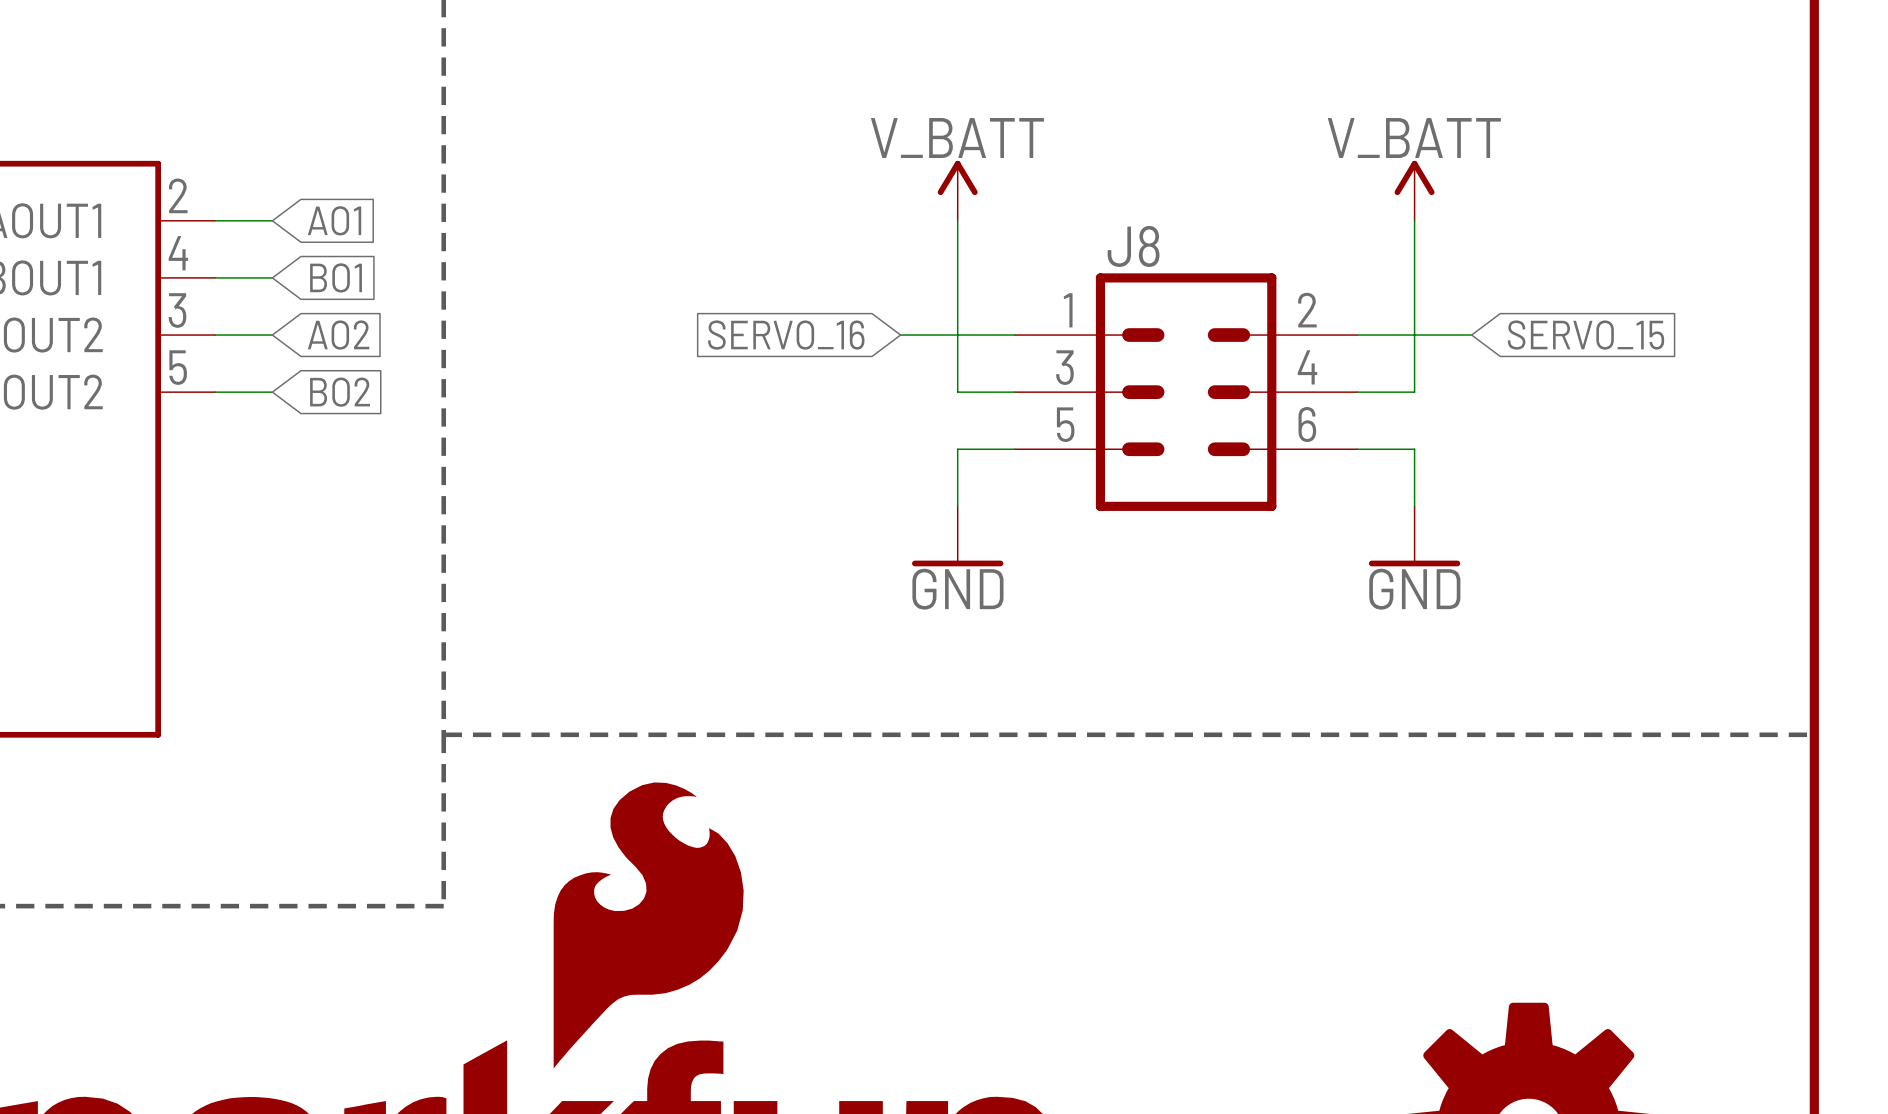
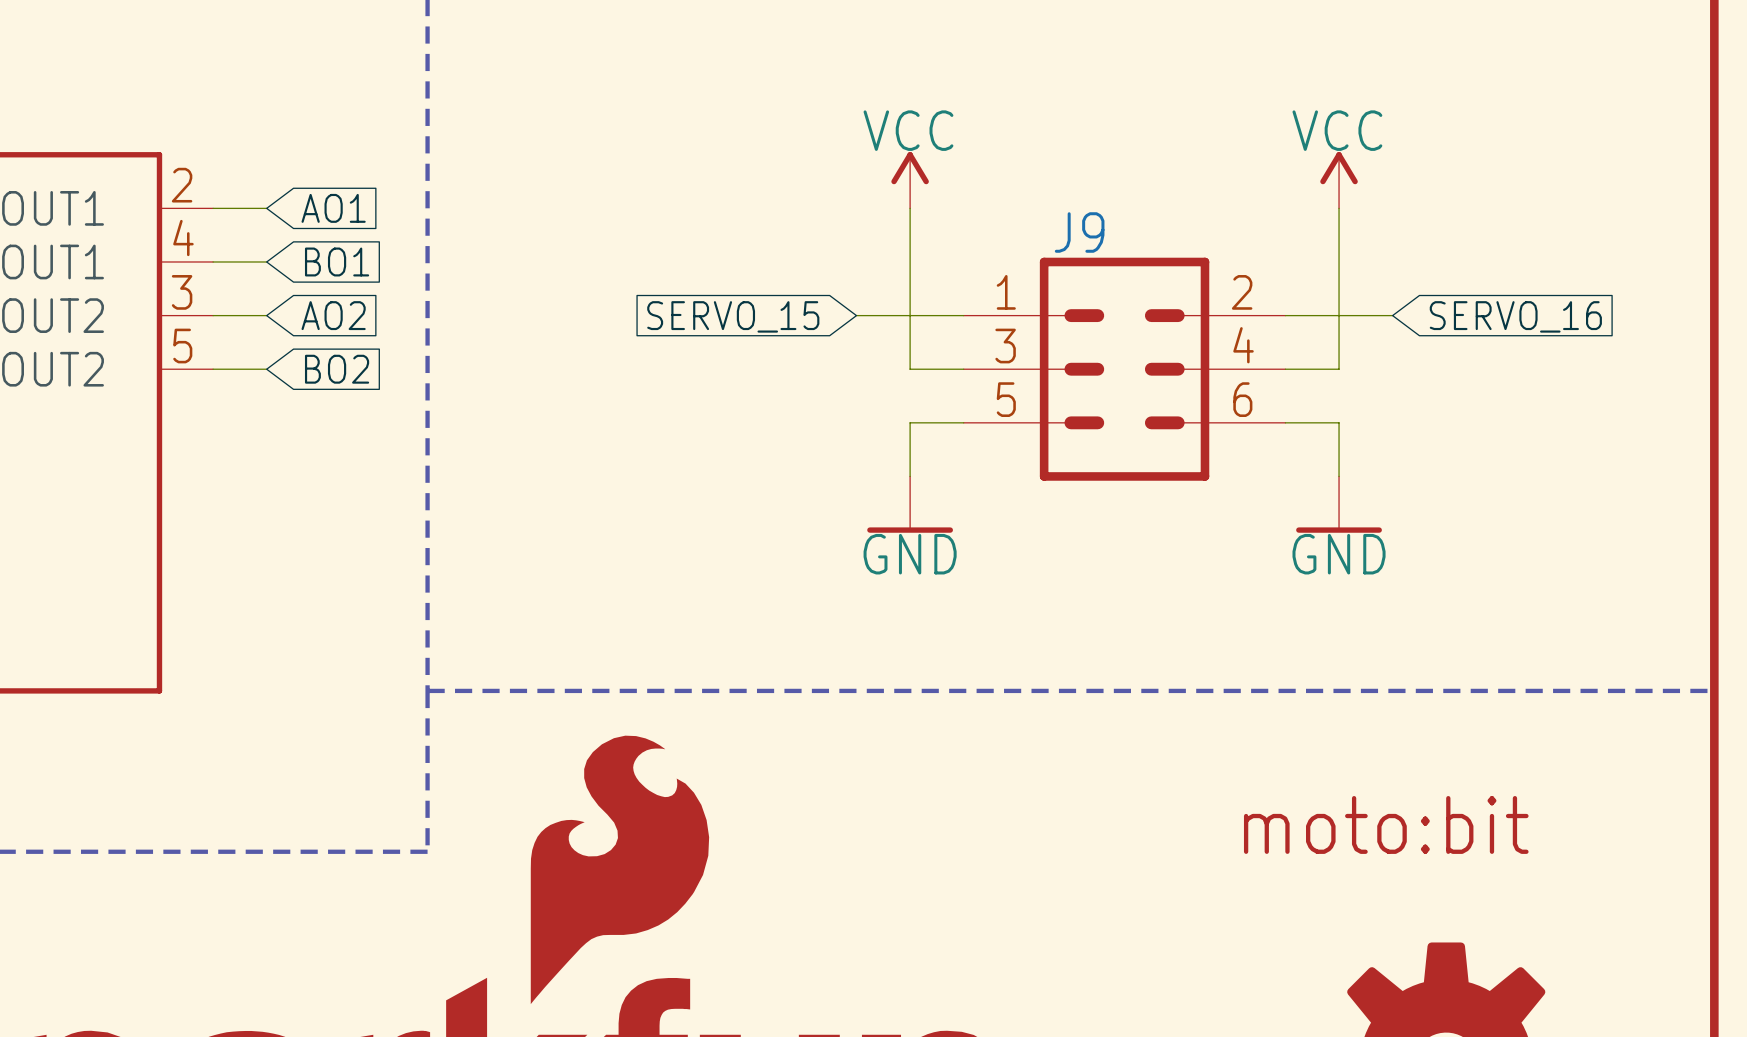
power symbol: V_BATT (957, 190) -> VCC (910, 180)
power symbol: V_BATT (1414, 190) -> VCC (1339, 180)
J8 name: J8 (1133, 246) -> J9 (1079, 232)
global label: SERVO_16 (786, 335) -> SERVO_15 (733, 316)
global label: SERVO_15 (1586, 335) -> SERVO_16 (1515, 316)
part: none -> (1386, 824)

